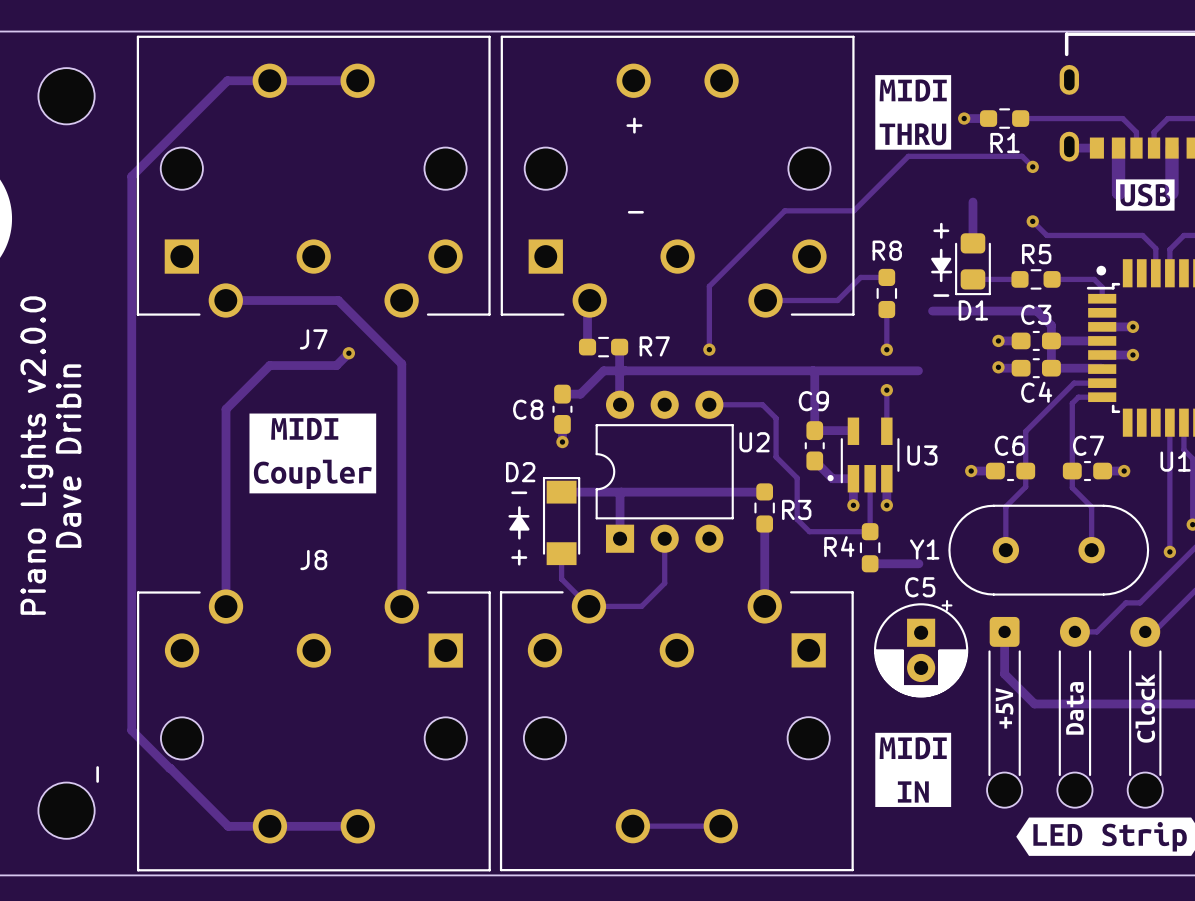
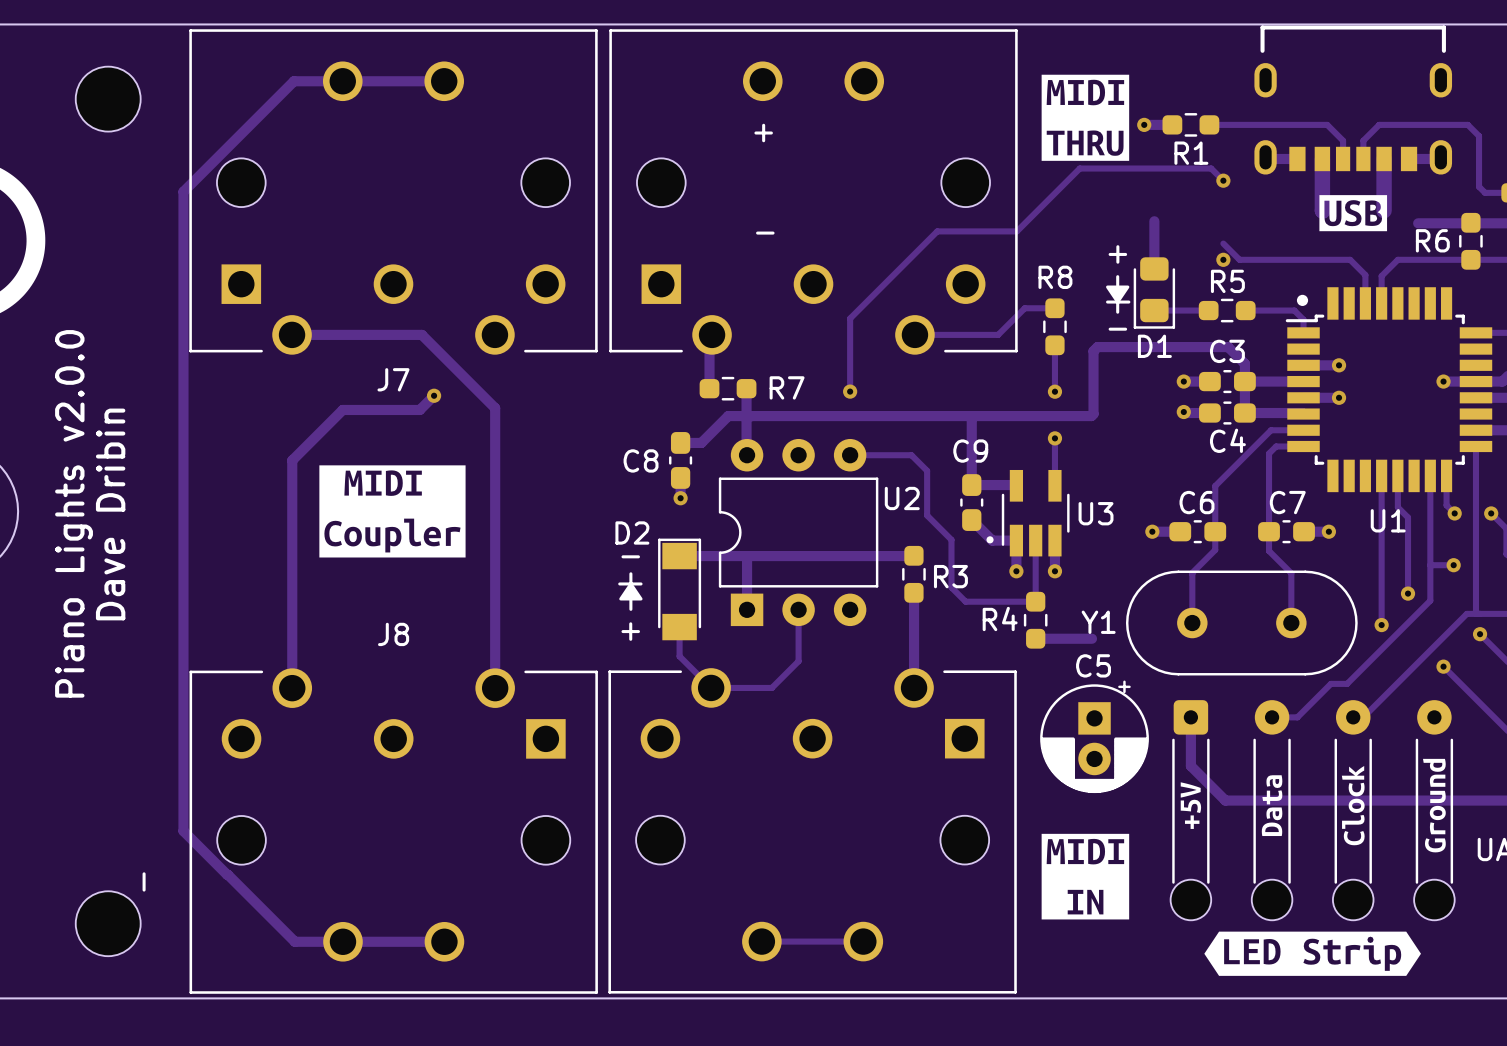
via position: (1032, 221) -> (1223, 259)
track: none -> (1107, 347) (1097, 347) (1093, 351) (1093, 414) (1091, 416)

